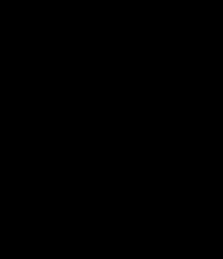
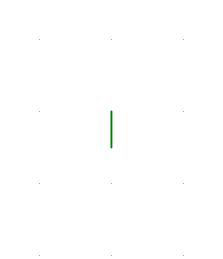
wire: none -> (111, 111) (111, 147)

